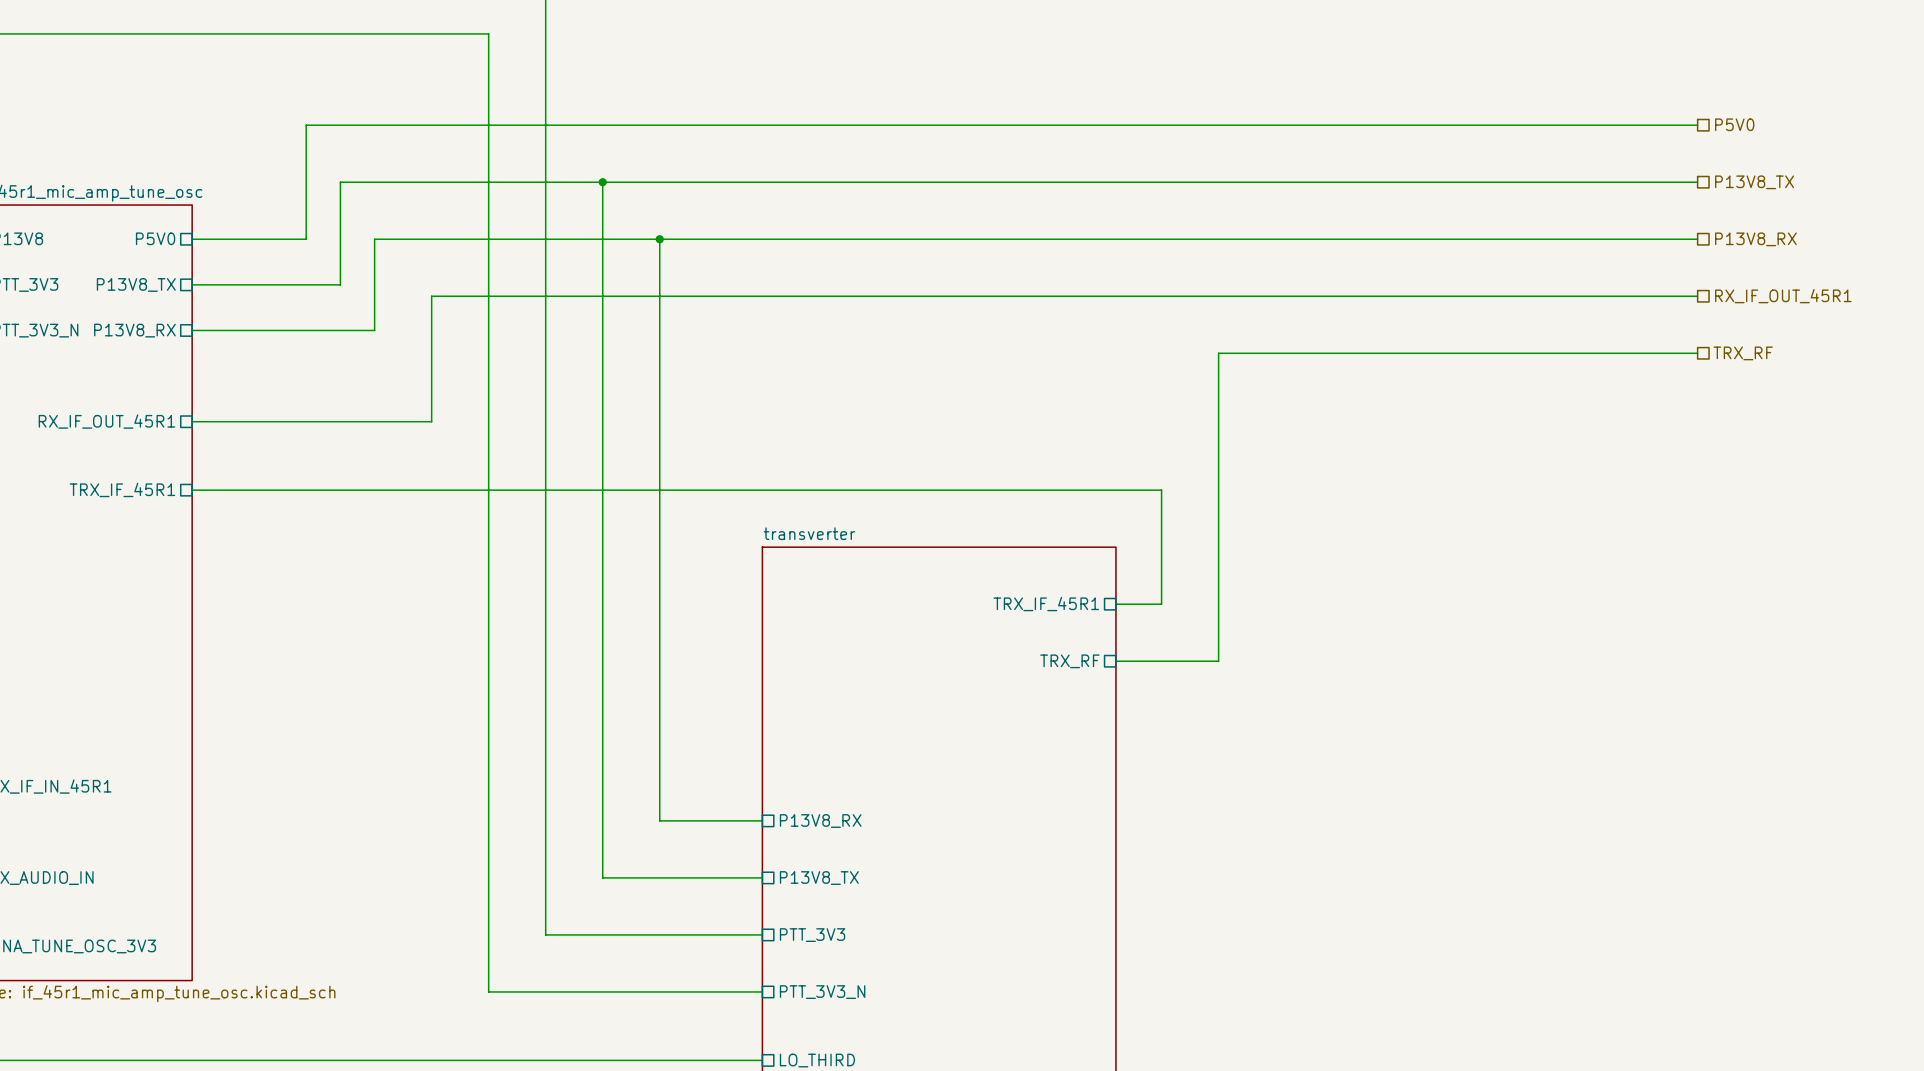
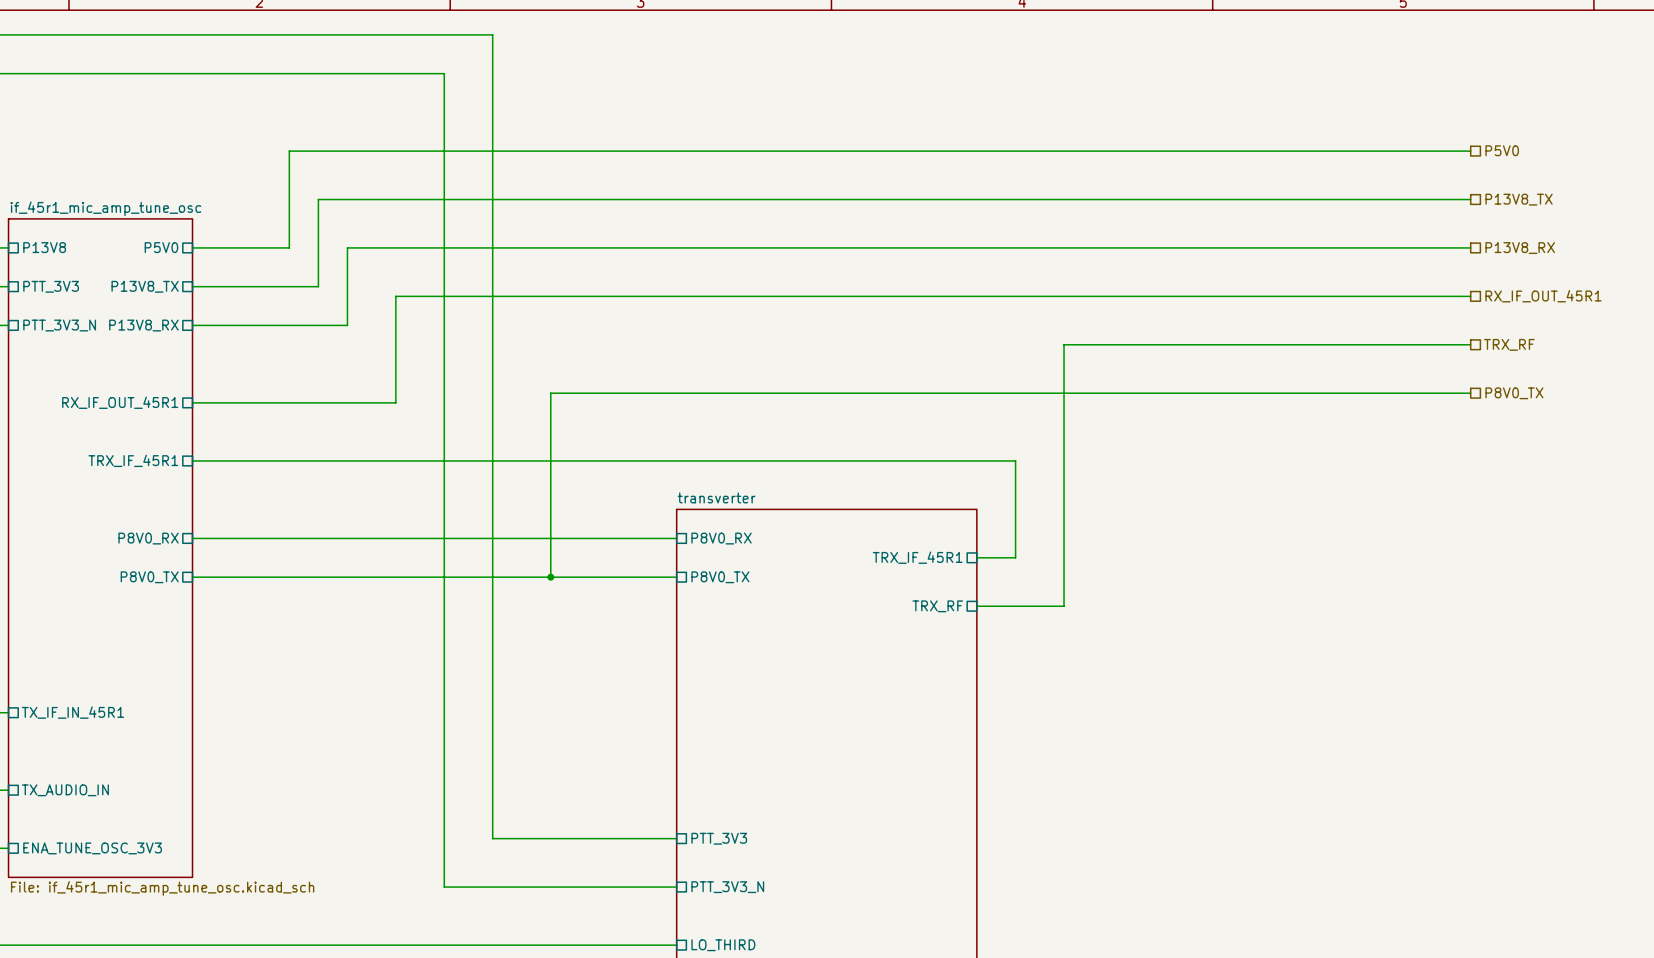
wire: (602, 182) (602, 877) (762, 877) -> none
junction: (602, 182) -> none
wire: (659, 239) (659, 820) (762, 820) -> none
junction: (659, 239) -> none
wire: none -> (1470, 393) (550, 393) (550, 577)
hierarchical label: none -> P8V0_TX (1514, 393)
sheet pin: none -> P8V0_RX (148, 538)
wire: none -> (192, 538) (676, 538)
sheet pin: none -> P8V0_RX (721, 538)
sheet pin: none -> P8V0_TX (149, 577)
wire: none -> (192, 577) (676, 577)
junction: none -> (550, 577)
sheet pin: none -> P8V0_TX (720, 577)
sheet pin: P13V8_RX (820, 821) -> none
sheet pin: P13V8_TX (819, 878) -> none

